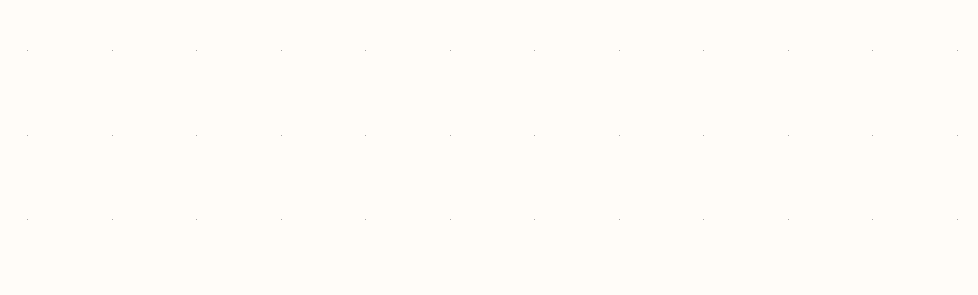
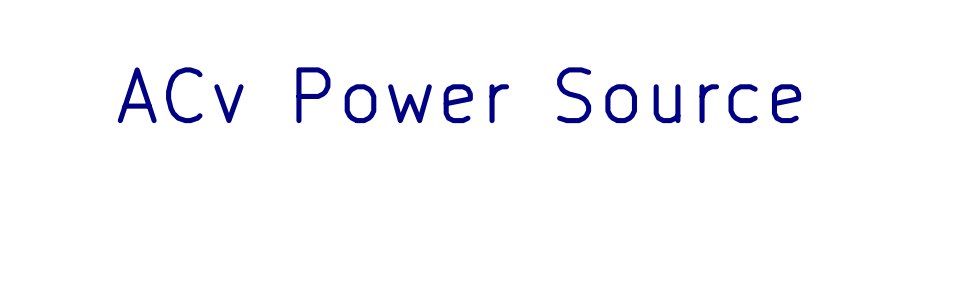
text: none -> ACv Power Source (459, 95)

